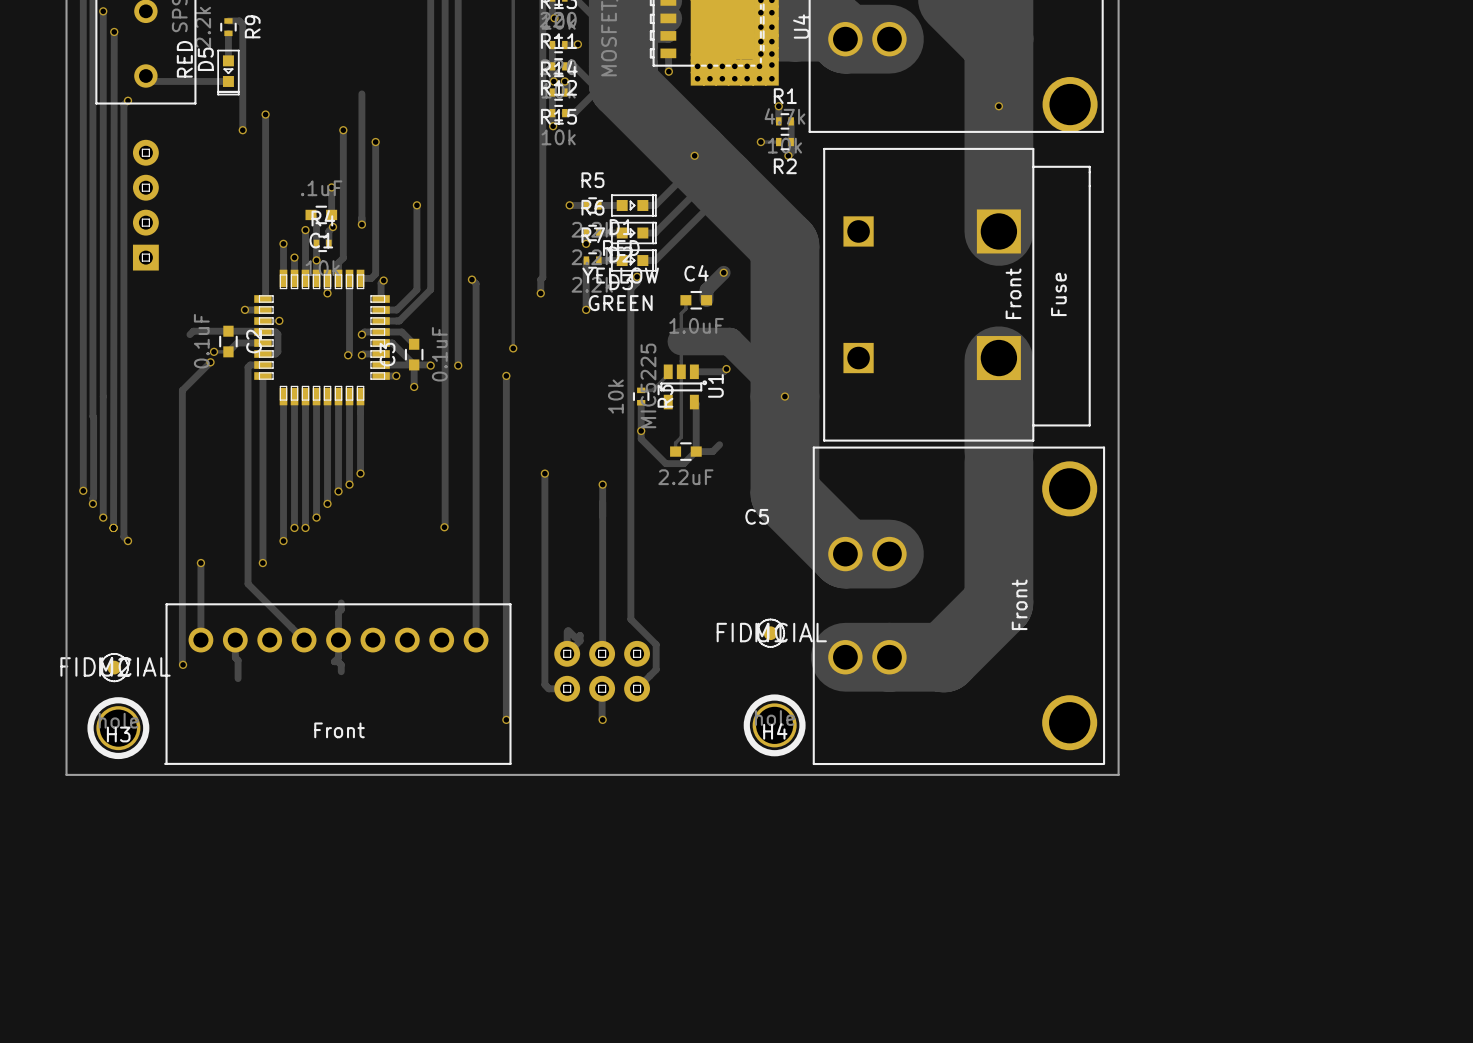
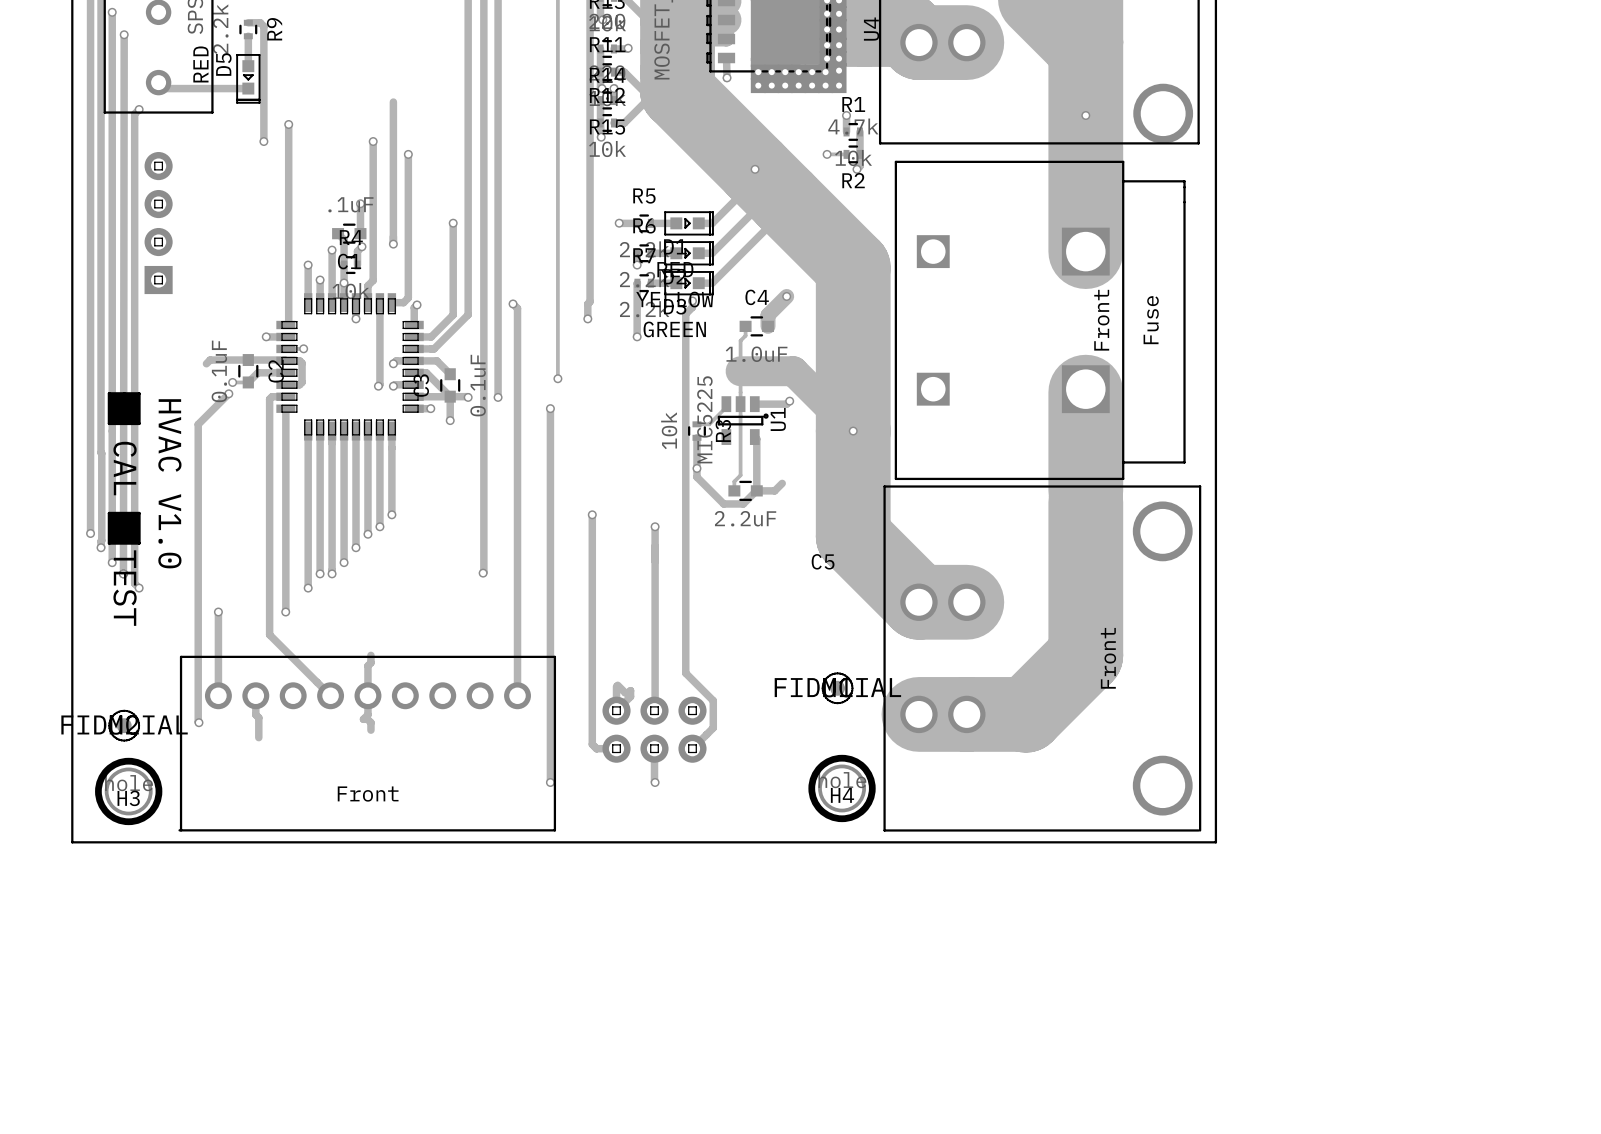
line: none -> (109, 393) (109, 423) (139, 423) (139, 393) (109, 393)
drawing: none -> [109, 393, 140, 424]
text: none -> CAL (125, 468)
text: none -> HVAC V1.0 (169, 483)
line: none -> (109, 513) (109, 543) (139, 543) (139, 513) (109, 513)
drawing: none -> [109, 513, 140, 544]
text: none -> TEST (125, 588)

